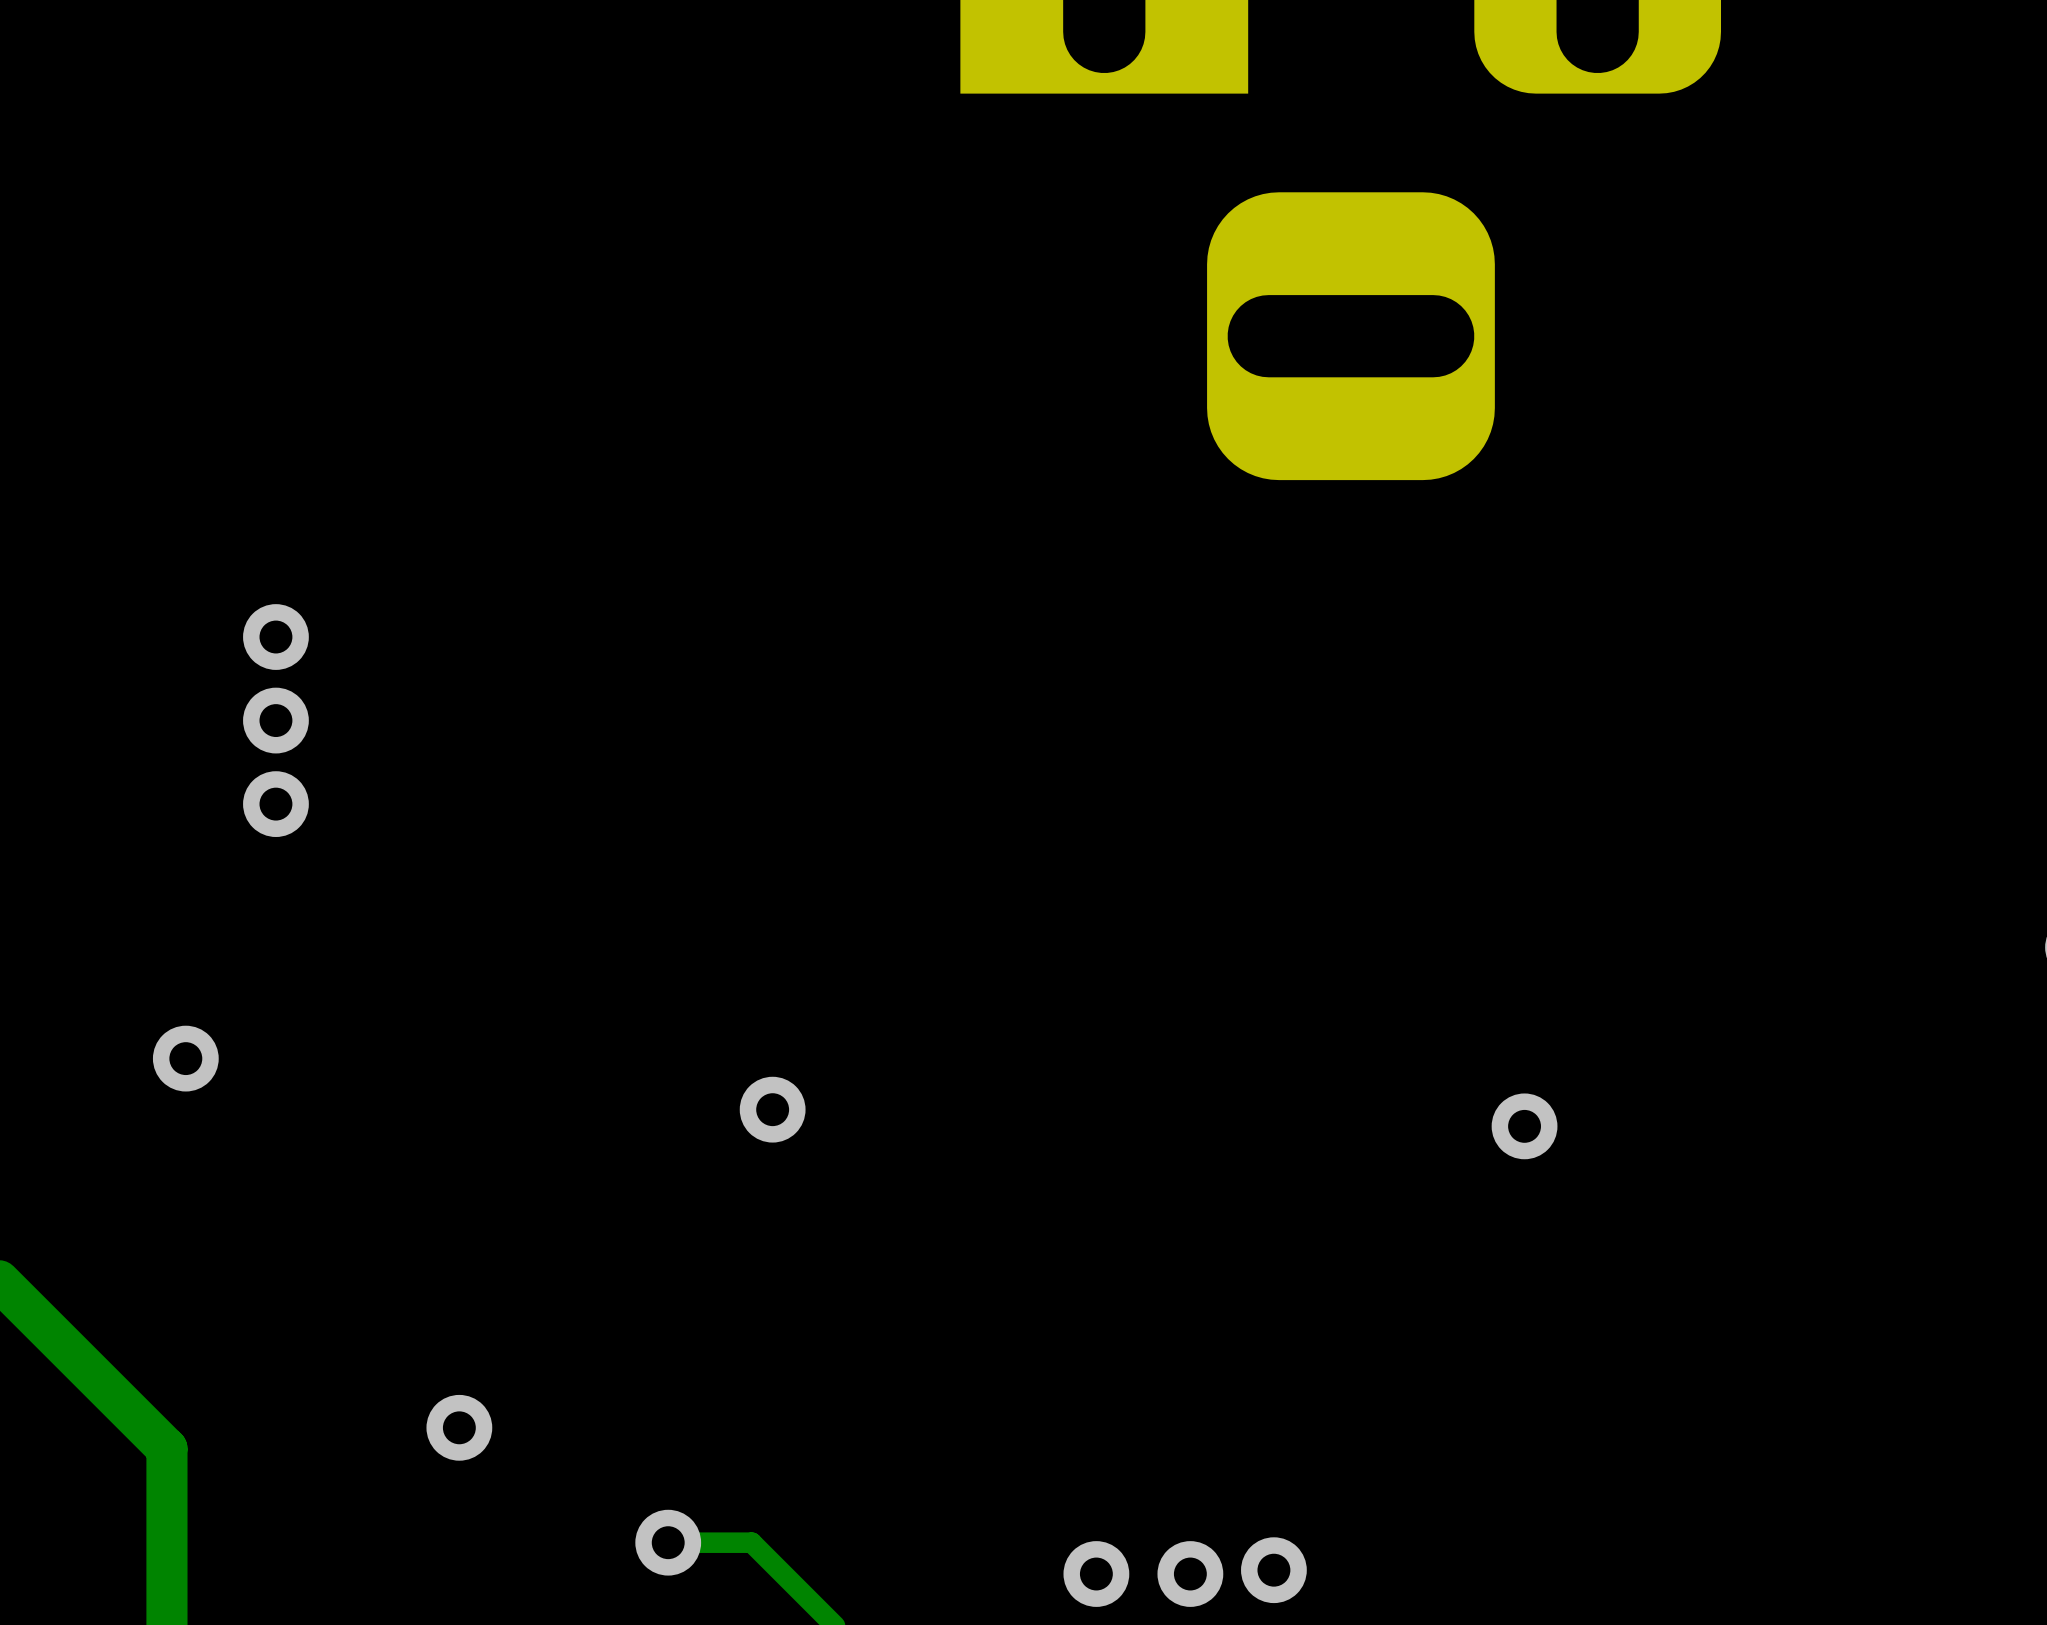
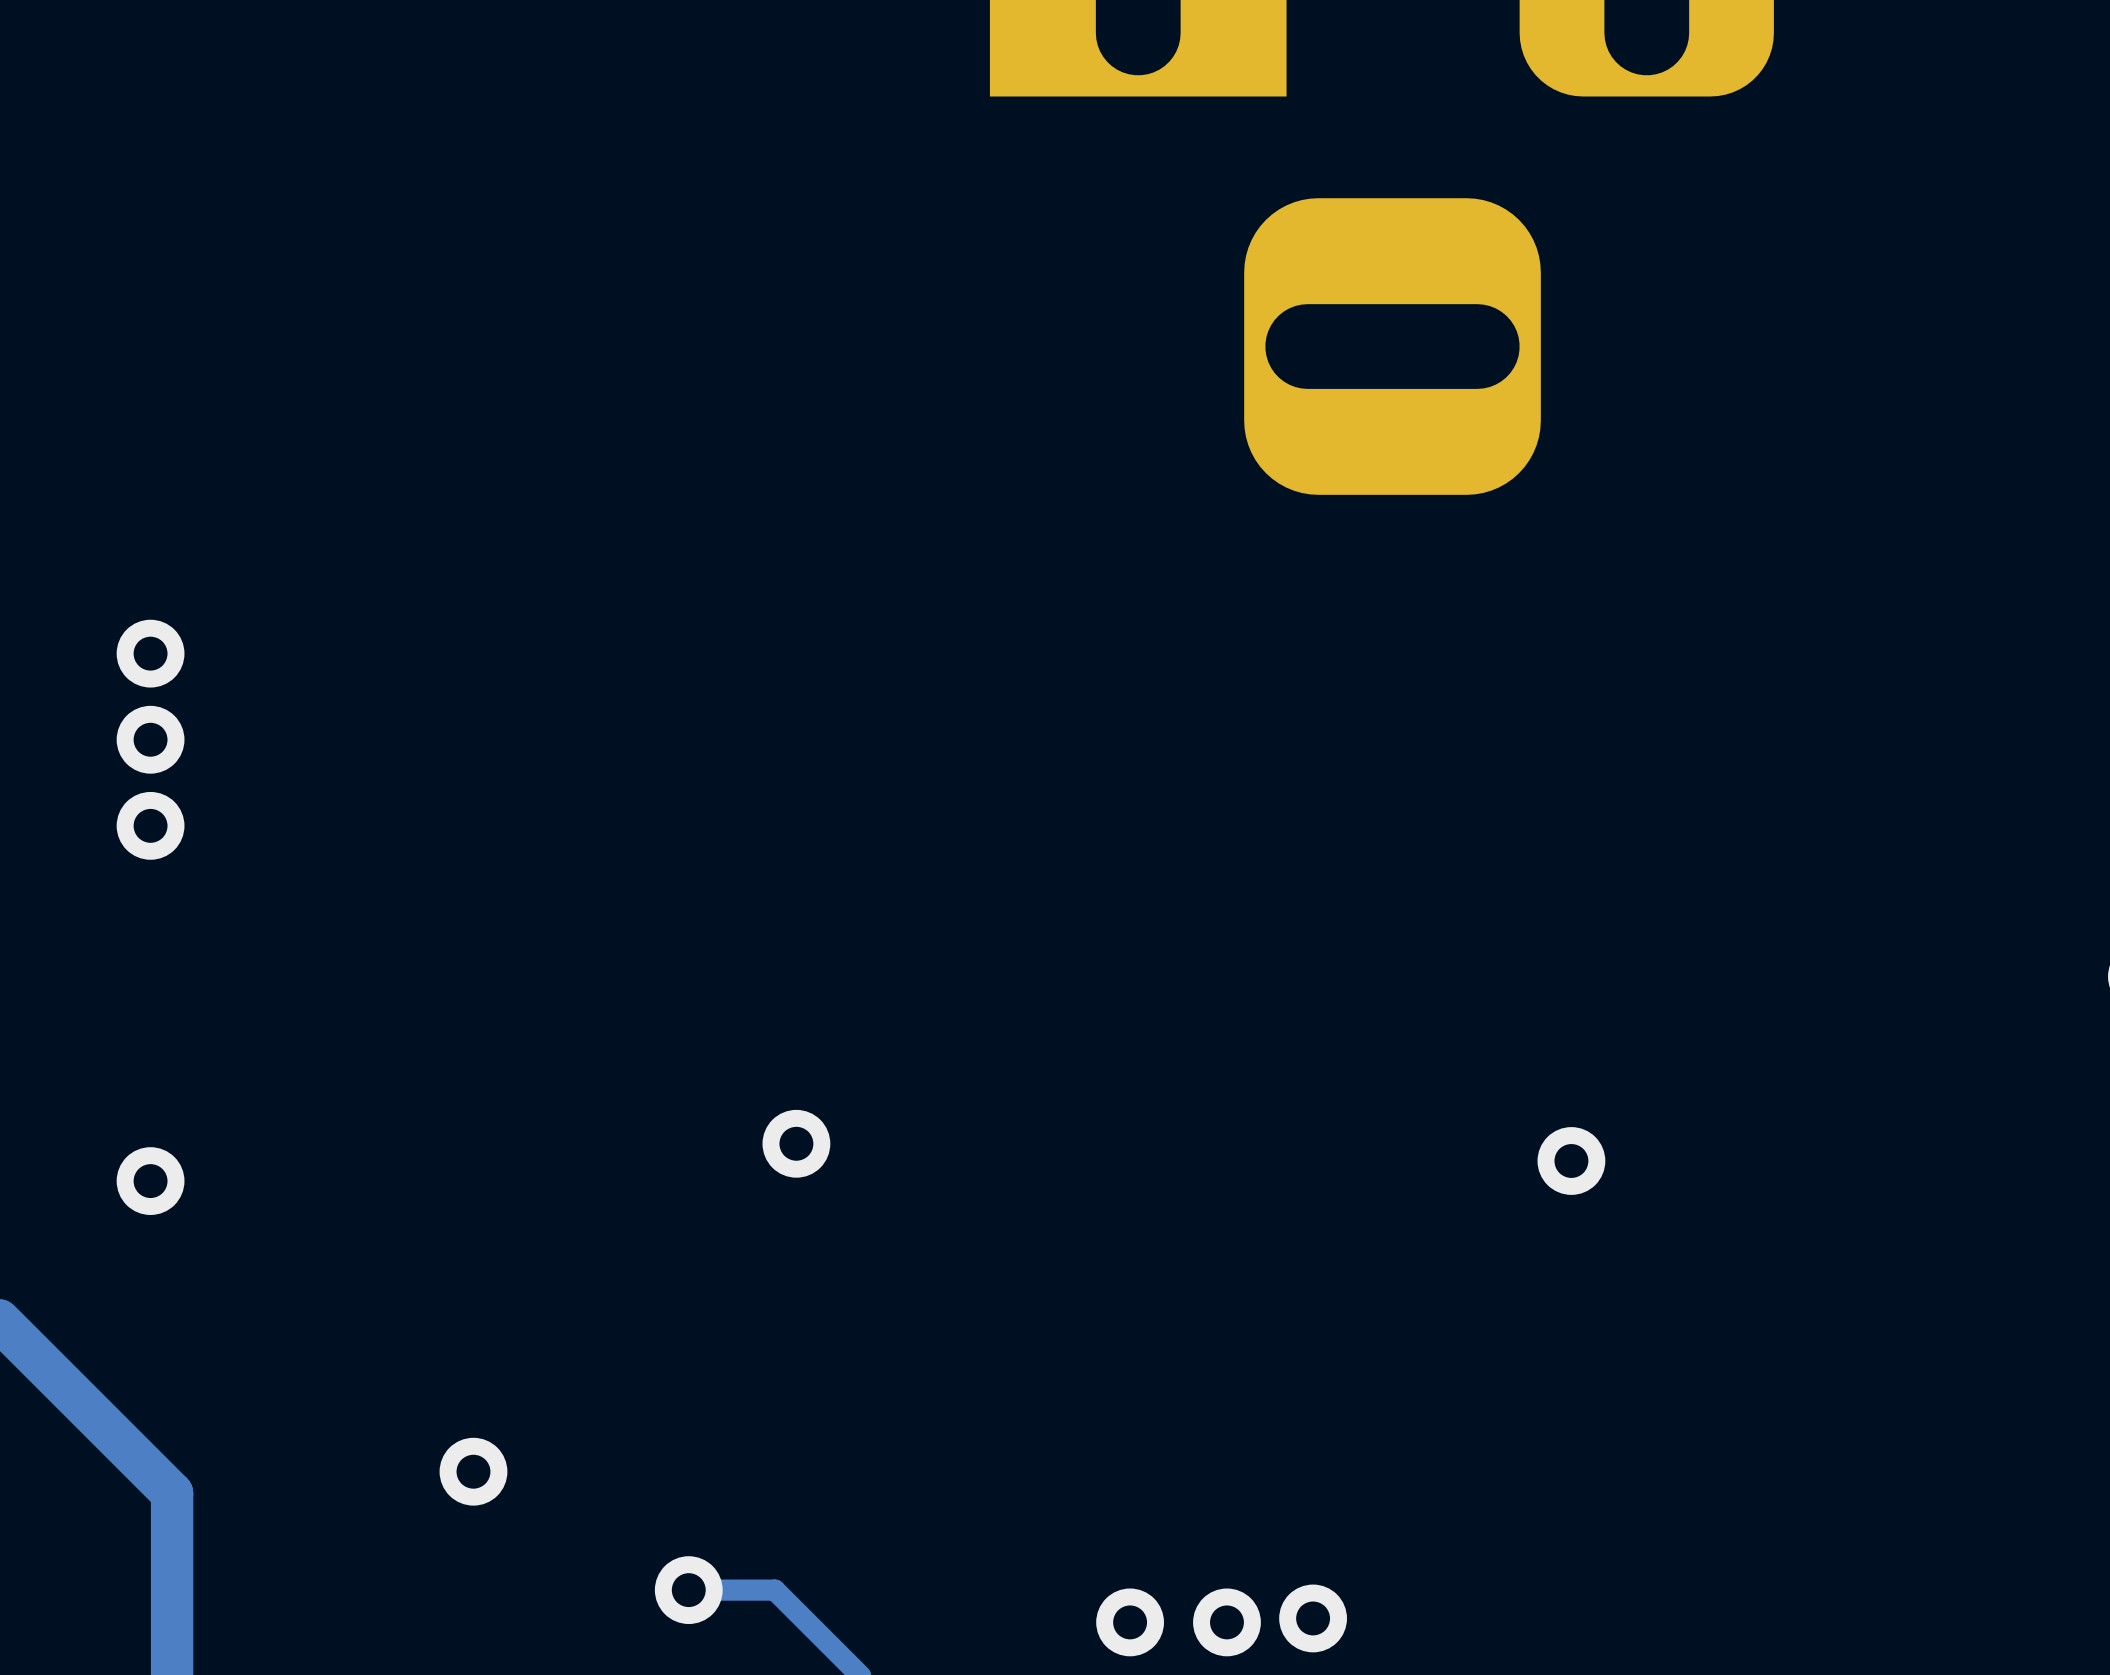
via: none -> (150, 653)
via: (275, 637) -> none
via: none -> (150, 739)
via: (275, 720) -> none
via: none -> (150, 825)
via: (275, 804) -> none
via position: (185, 1058) -> (150, 1181)

